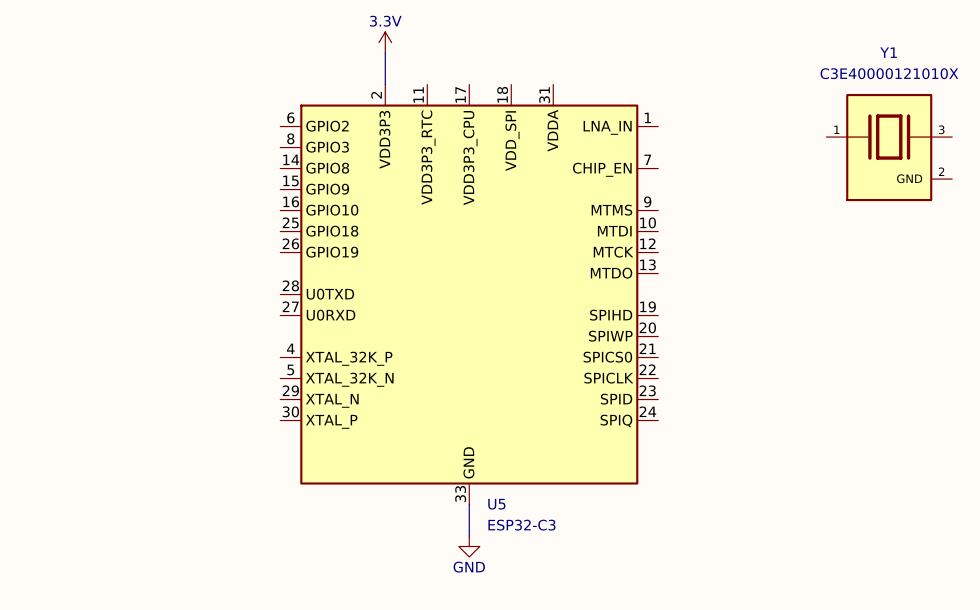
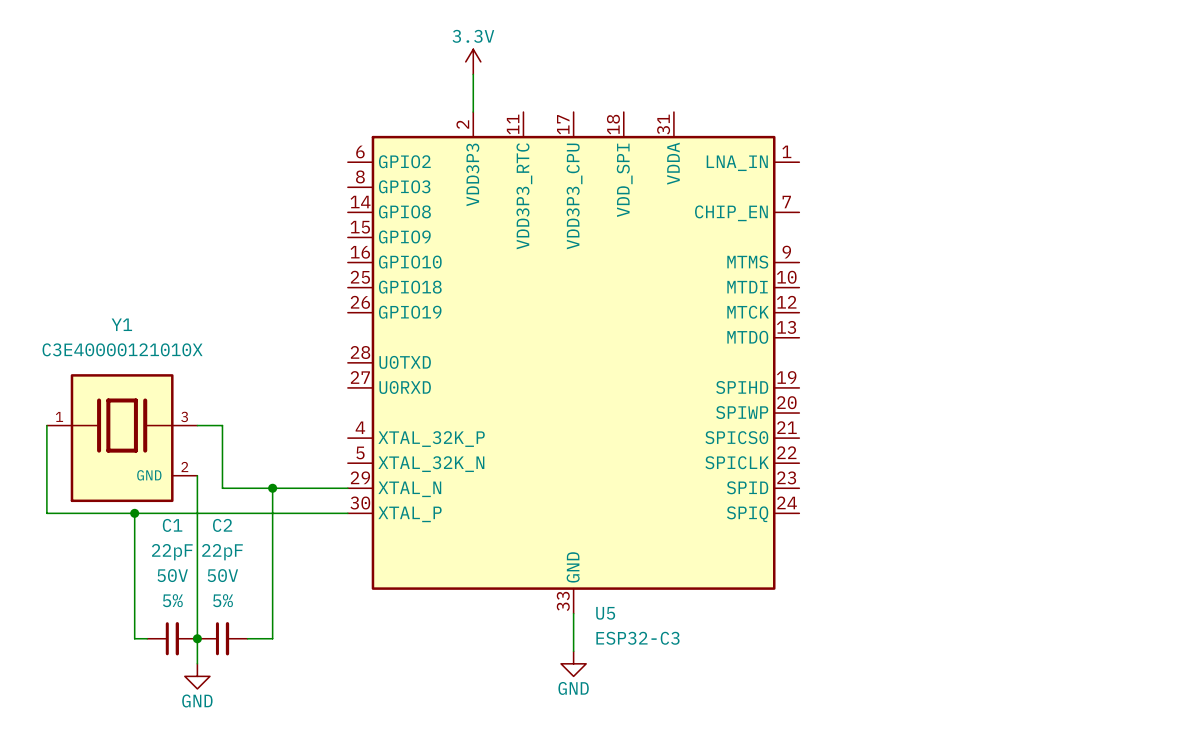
Y1 position: (889, 147) -> (122, 438)
wire: none -> (46, 425) (46, 513) (347, 513)
wire: none -> (197, 425) (222, 425) (222, 488) (347, 488)
wire: none -> (197, 475) (197, 663)
wire: none -> (272, 488) (272, 638) (247, 638)
junction: none -> (272, 488)
wire: none -> (134, 513) (134, 638) (147, 638)
junction: none -> (134, 513)
C1: none -> 22pF (172, 638)
junction: none -> (197, 638)
C2: none -> 22pF (222, 638)
power symbol: none -> GND (197, 676)

